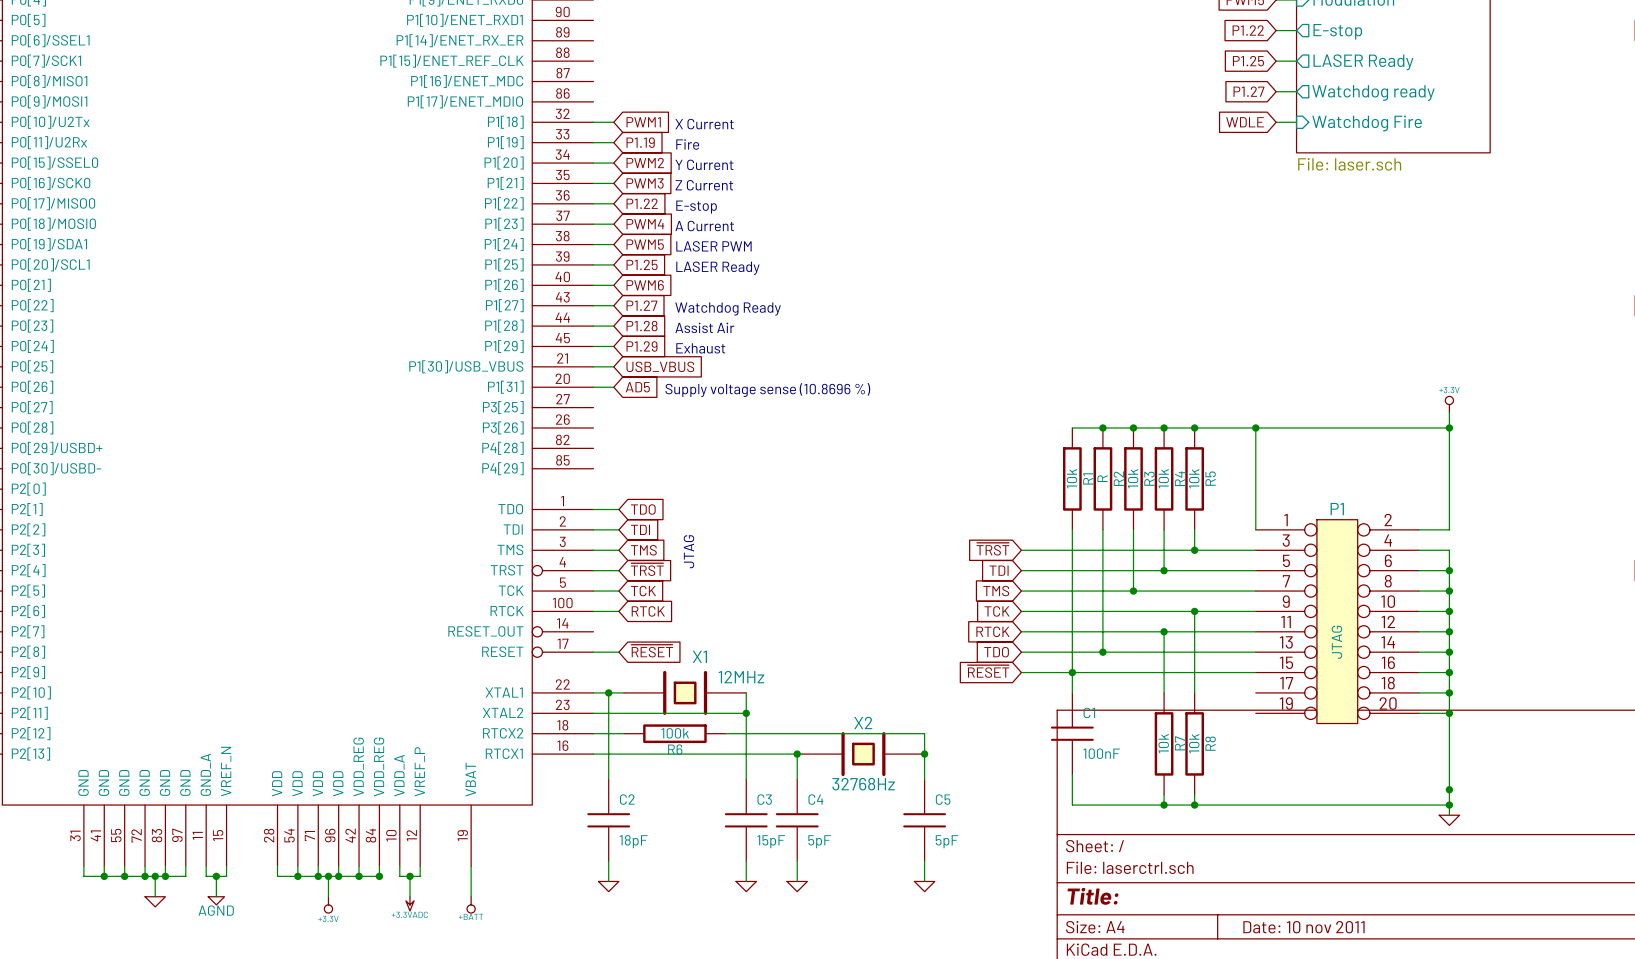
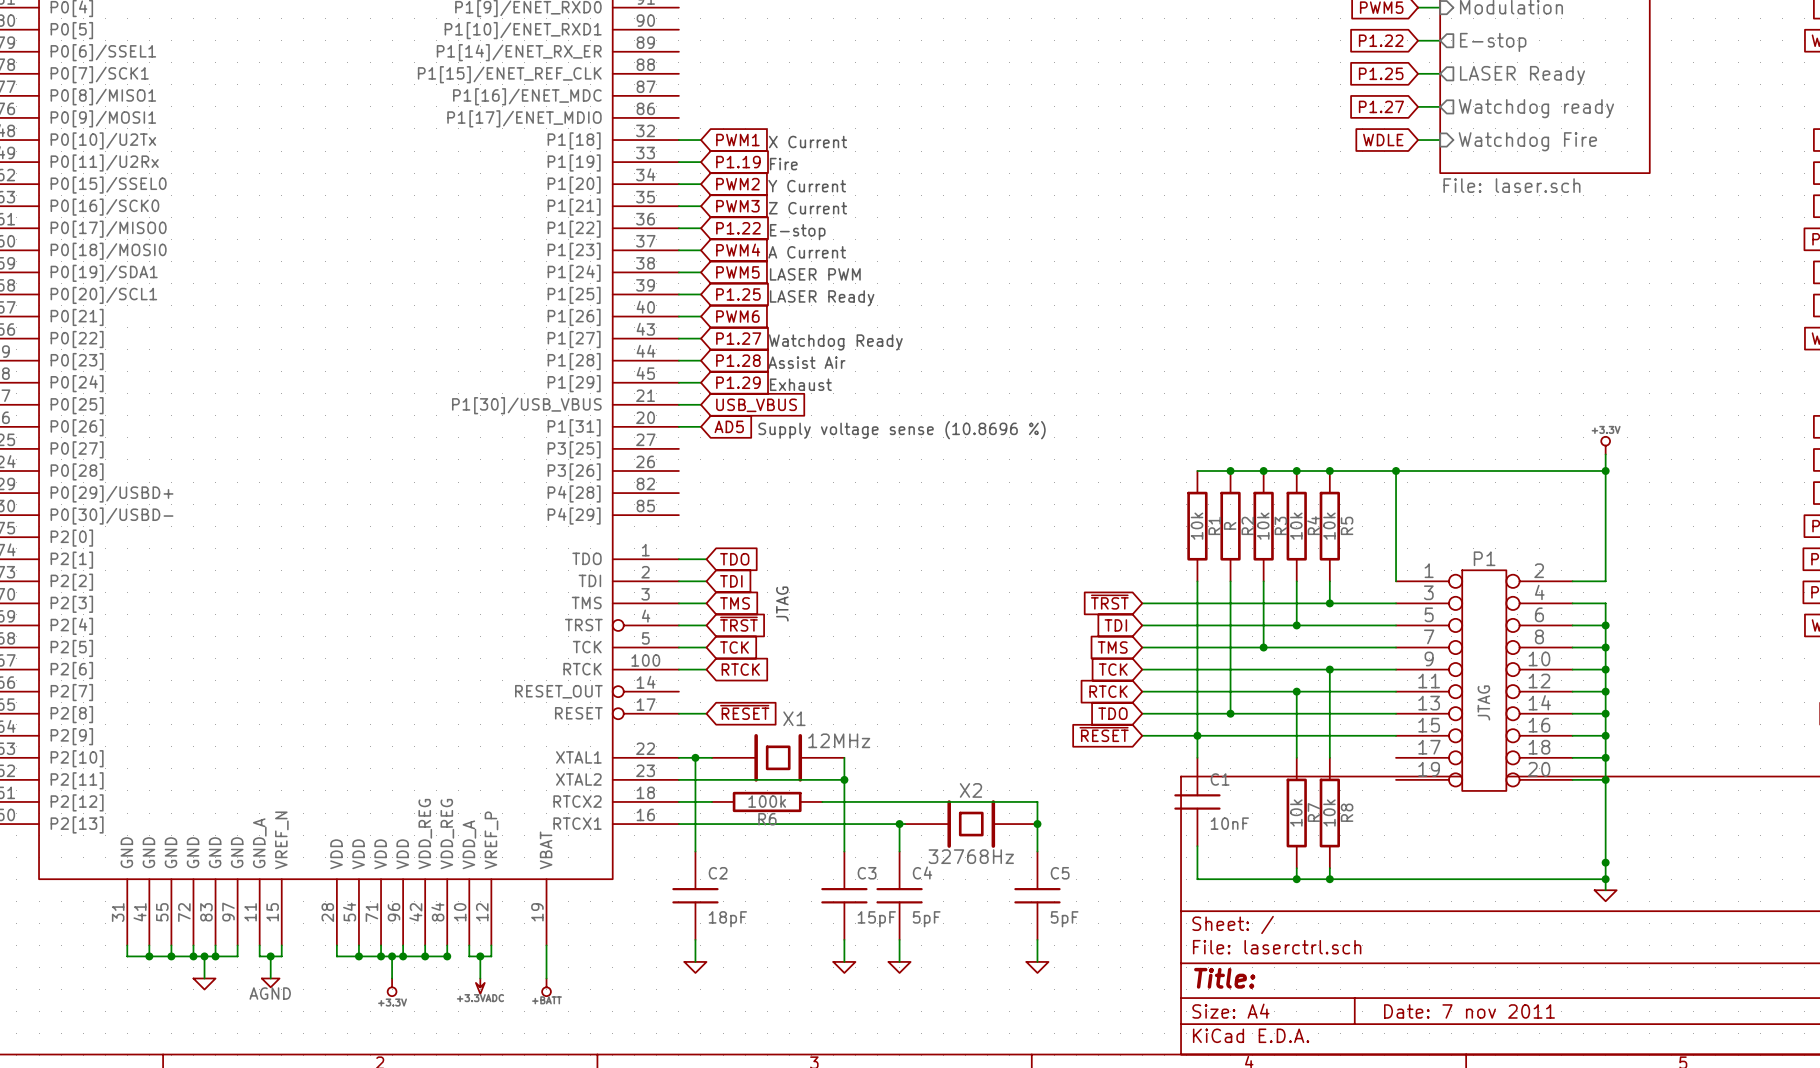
C1 value: 100nF (1101, 753) -> 10nF (1229, 823)
title block: Date: 10 nov 2011 (1303, 927) -> Date: 7 nov 2011 (1469, 1011)

